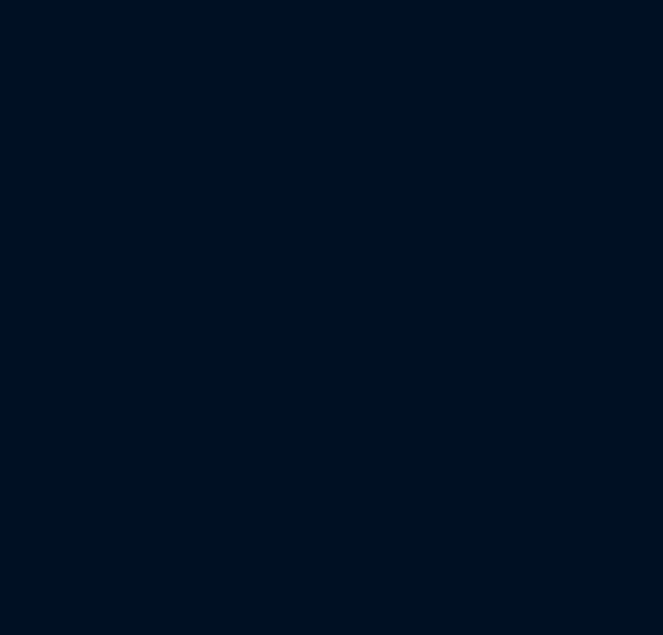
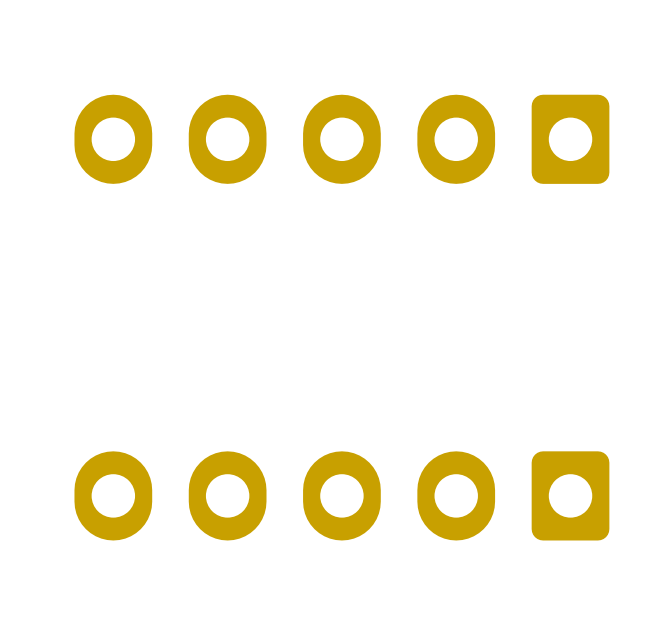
part: none -> (341, 139)
part: none -> (341, 495)

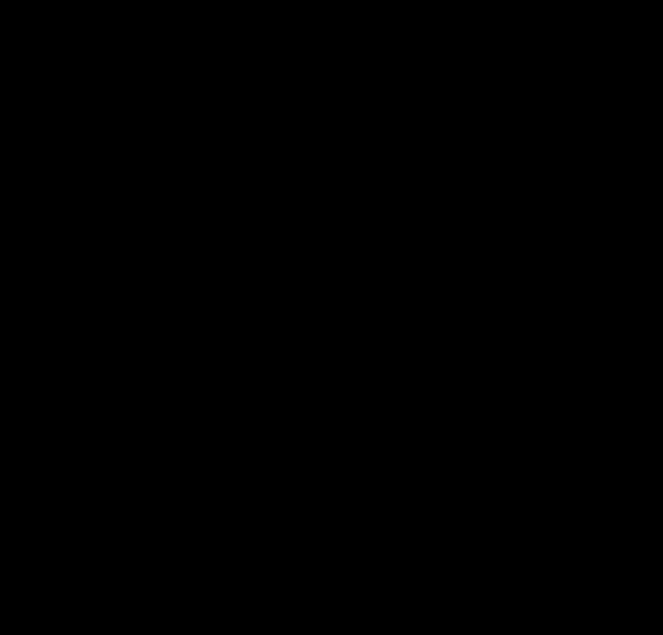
part: (341, 139) -> none
part: (341, 495) -> none

